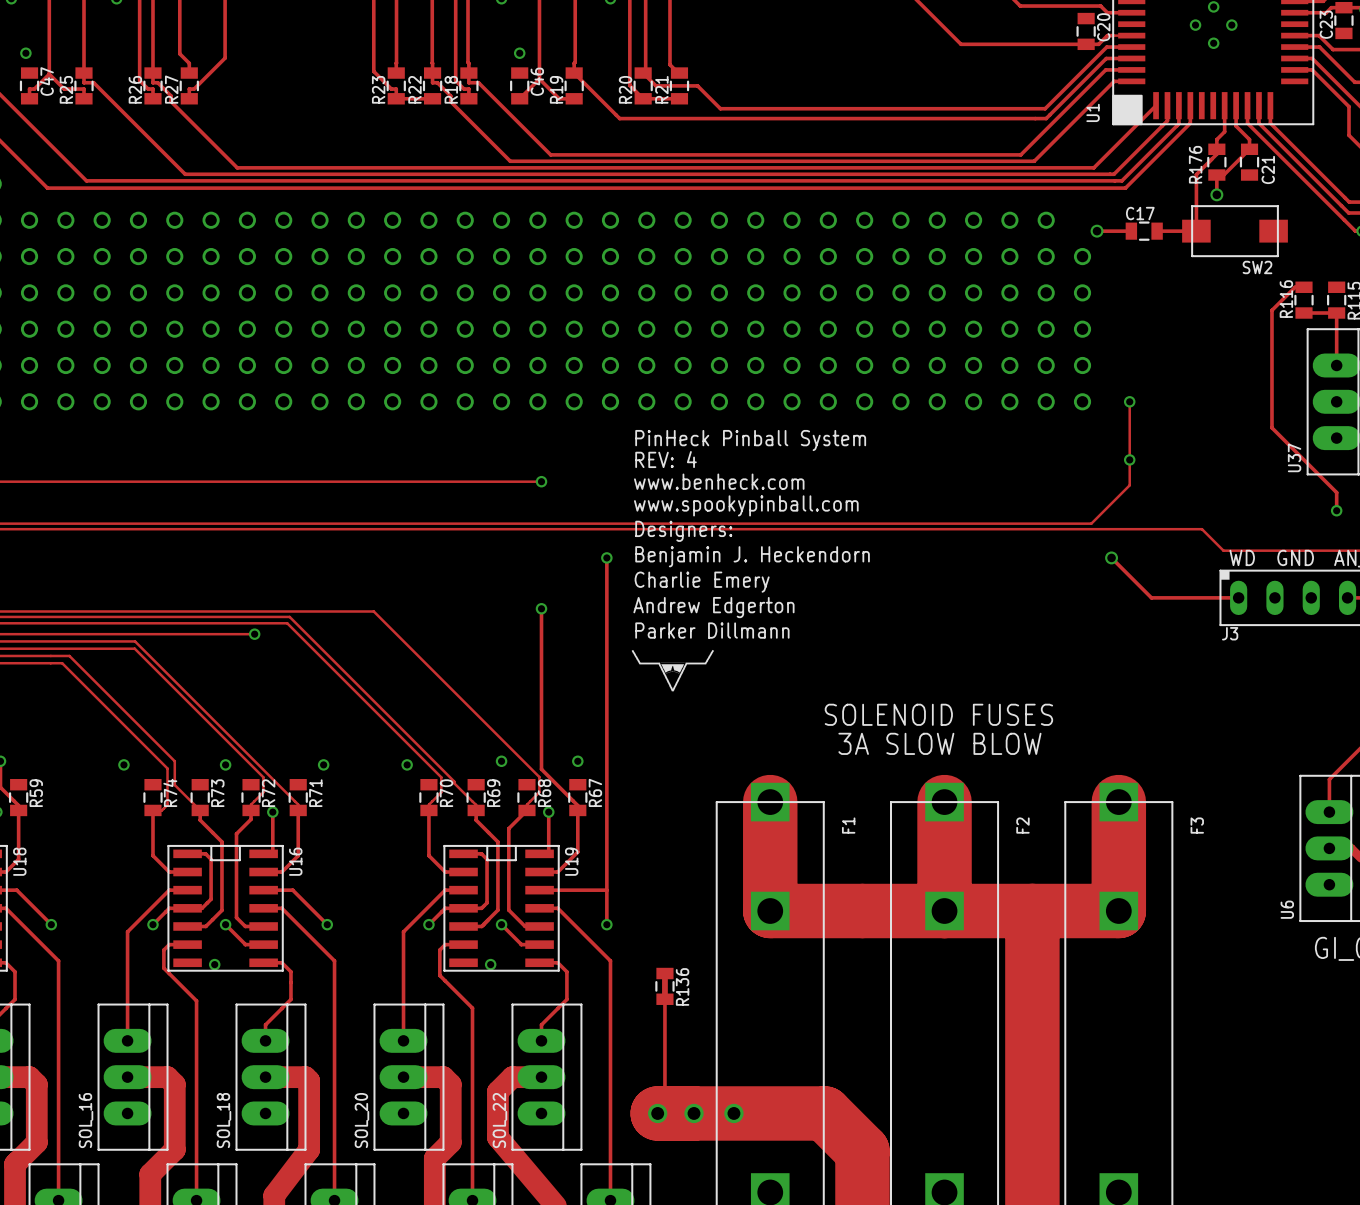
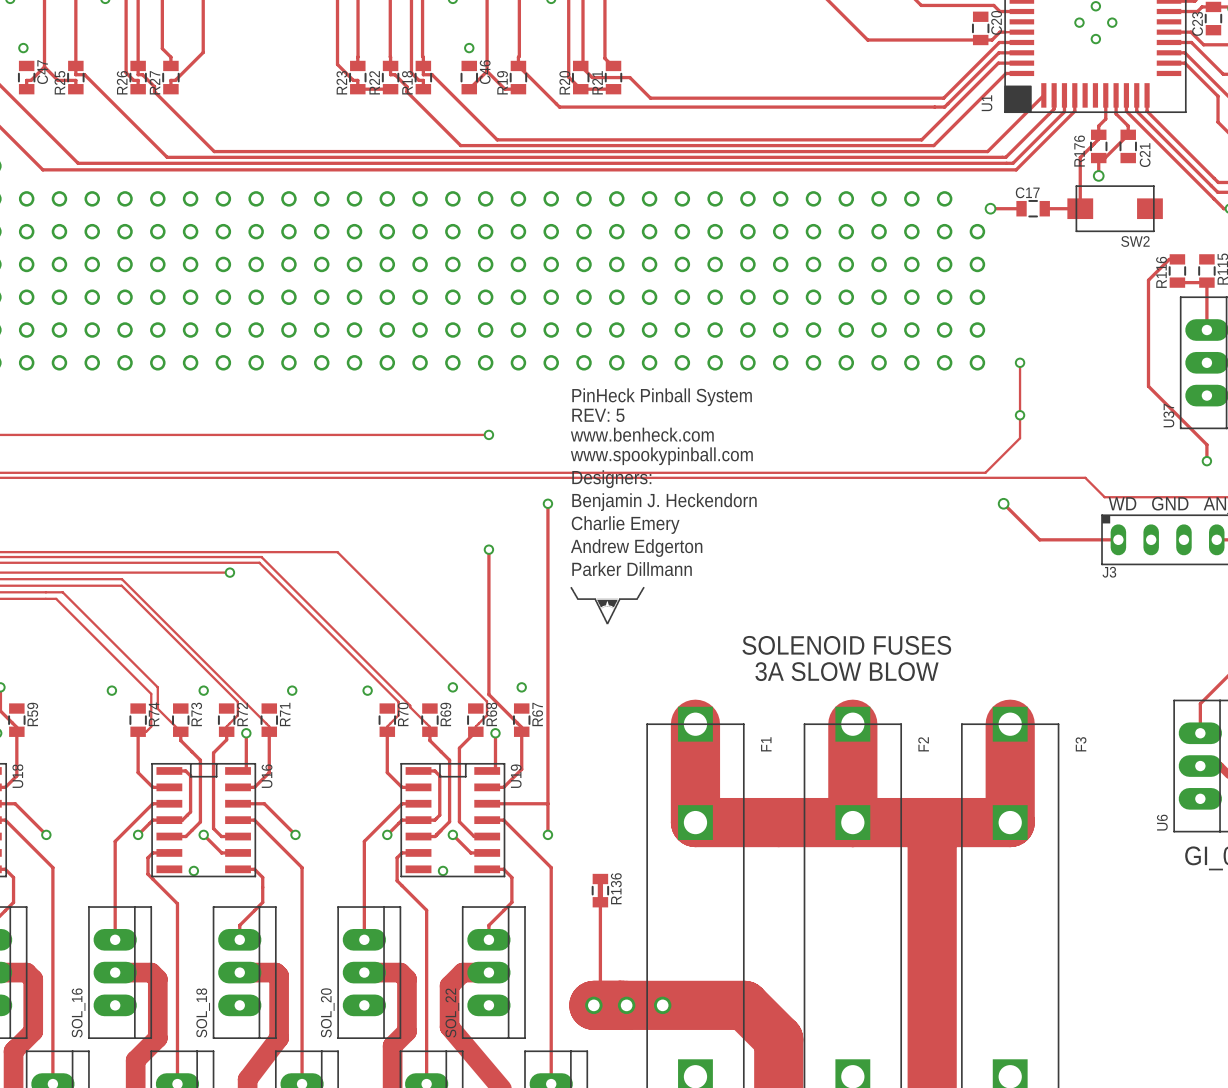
text: REV: 4 (666, 459) -> REV: 5 (598, 415)

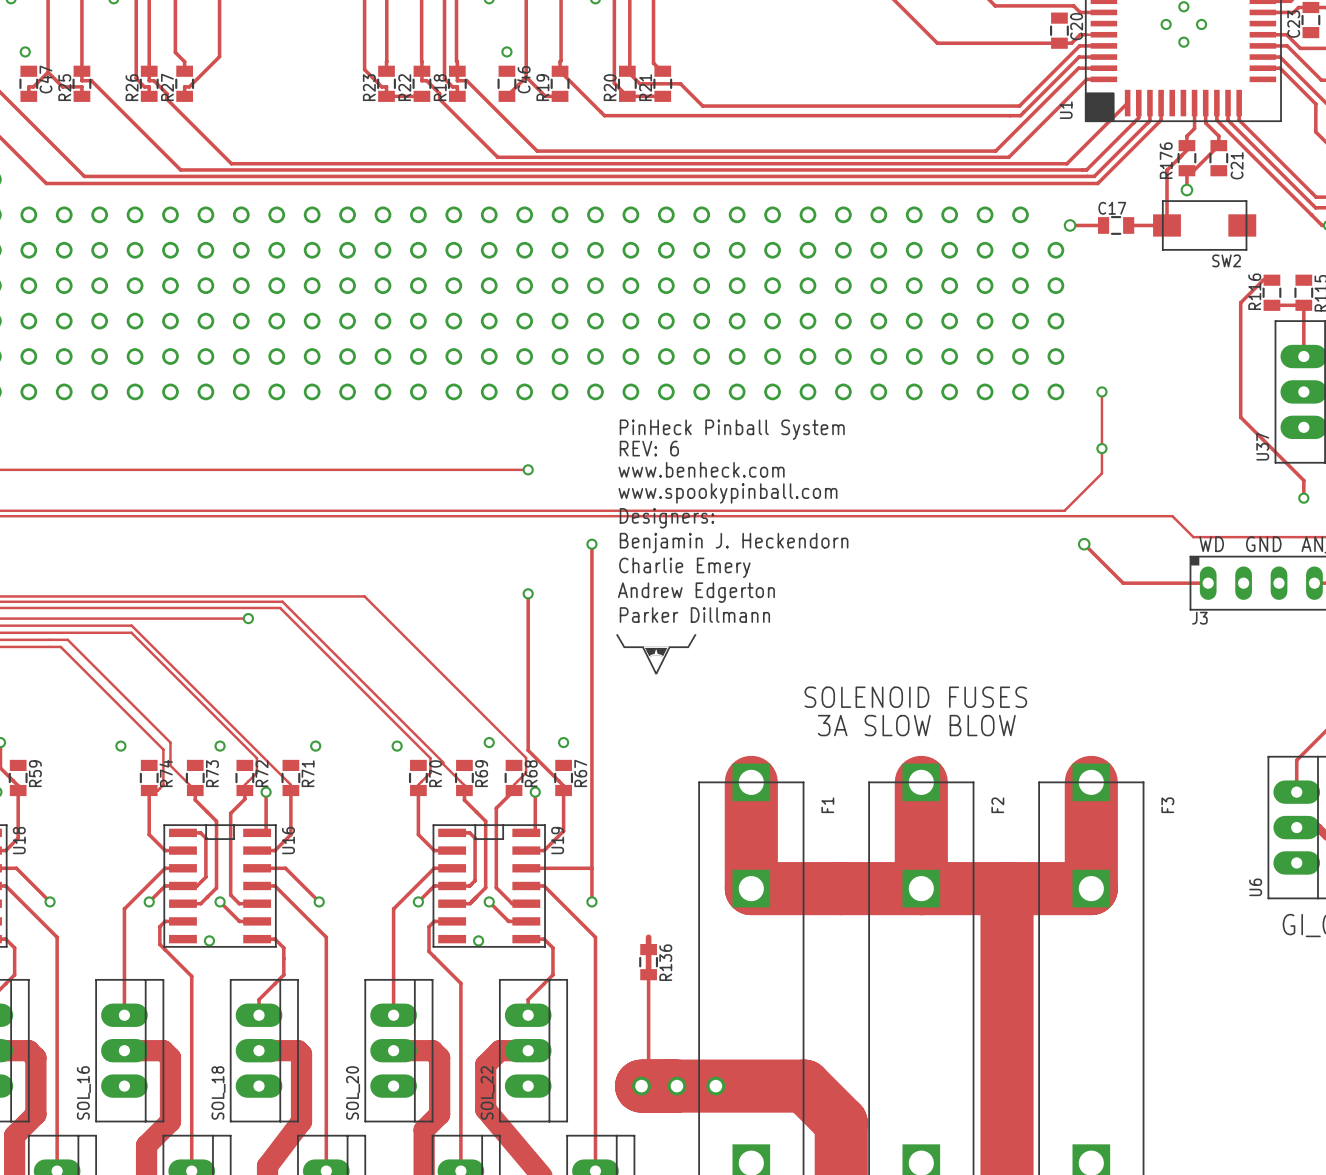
text: REV: 5 (598, 415) -> REV: 6 (649, 448)
track: none -> (648, 937) (648, 947)

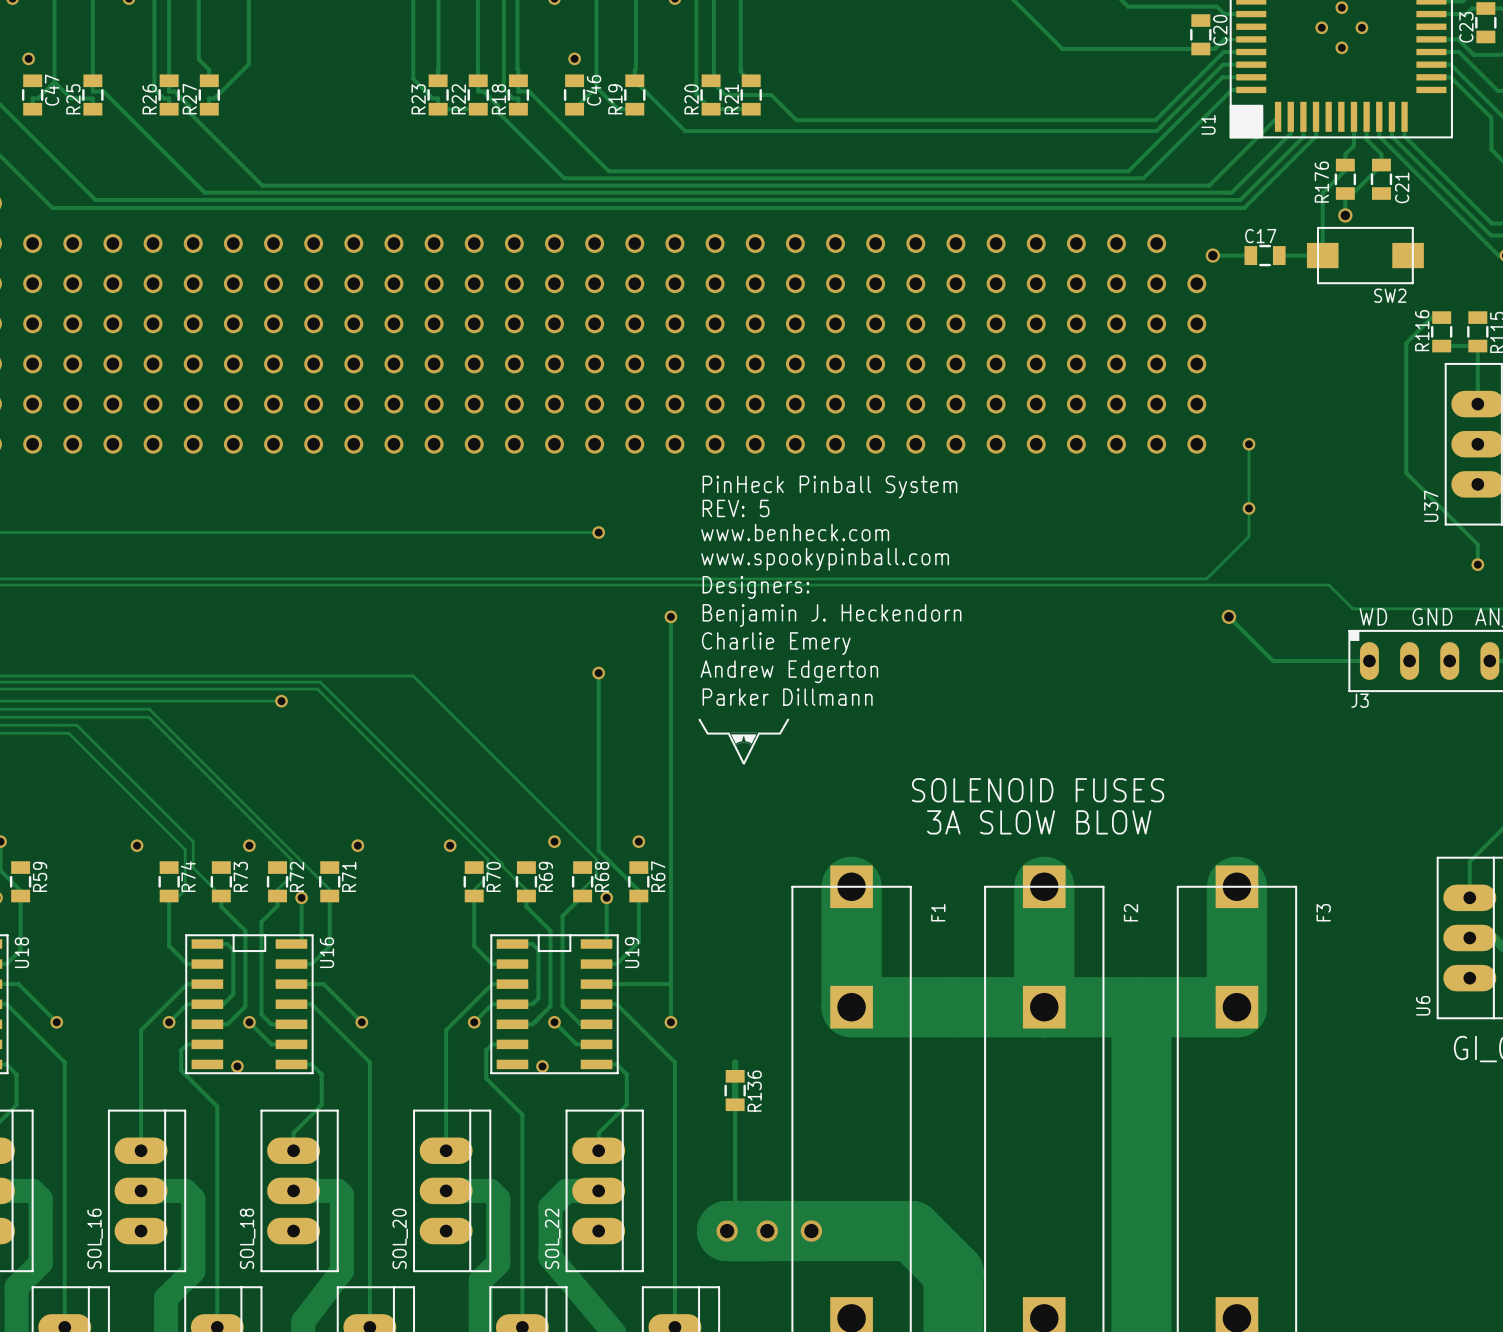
text: REV: 6 (649, 448) -> REV: 5 (736, 508)

